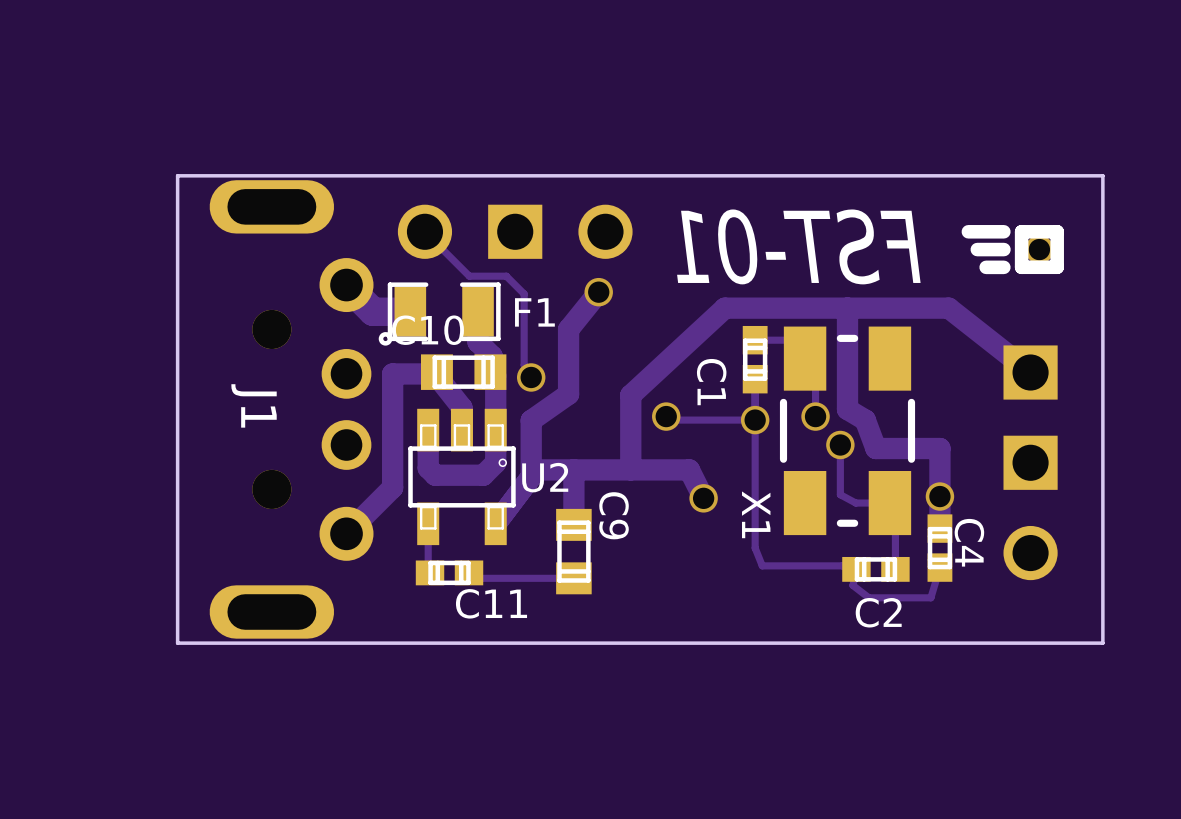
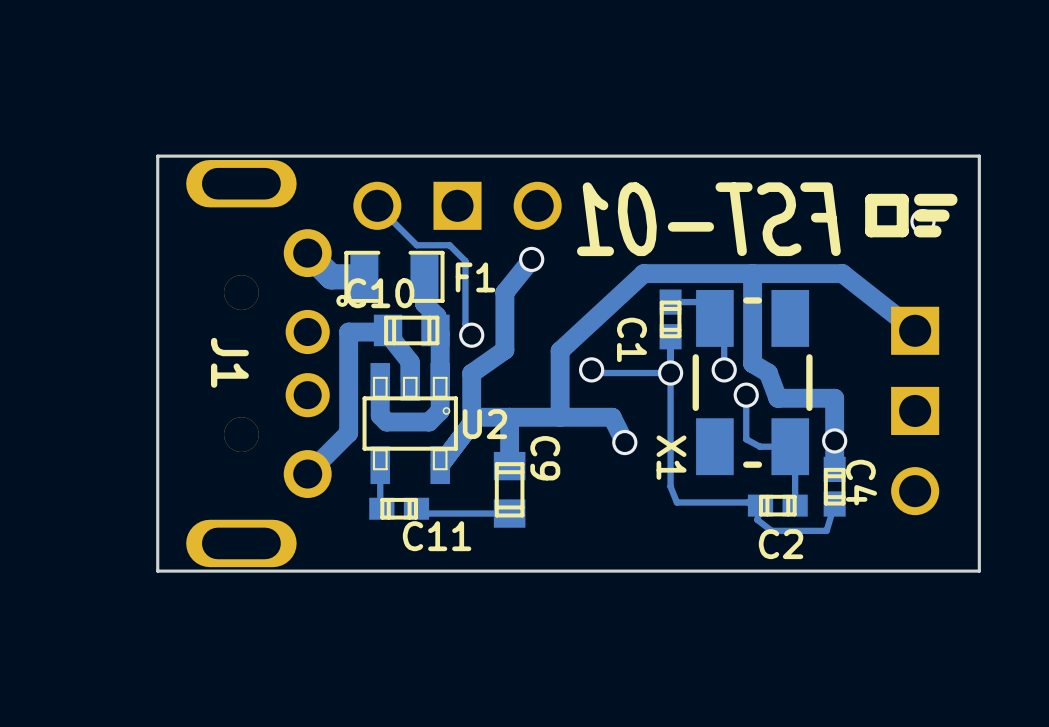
line: (1003, 231) (968, 231) -> (951, 199) (920, 199)
line: (1057, 231) (1057, 267) (1021, 267) (1021, 231) (1057, 231) -> (902, 199) (902, 231) (871, 231) (871, 199) (902, 199)
line: (1003, 249) (977, 249) -> (943, 215) (919, 215)
line: (1003, 267) (986, 267) -> (935, 231) (919, 231)

